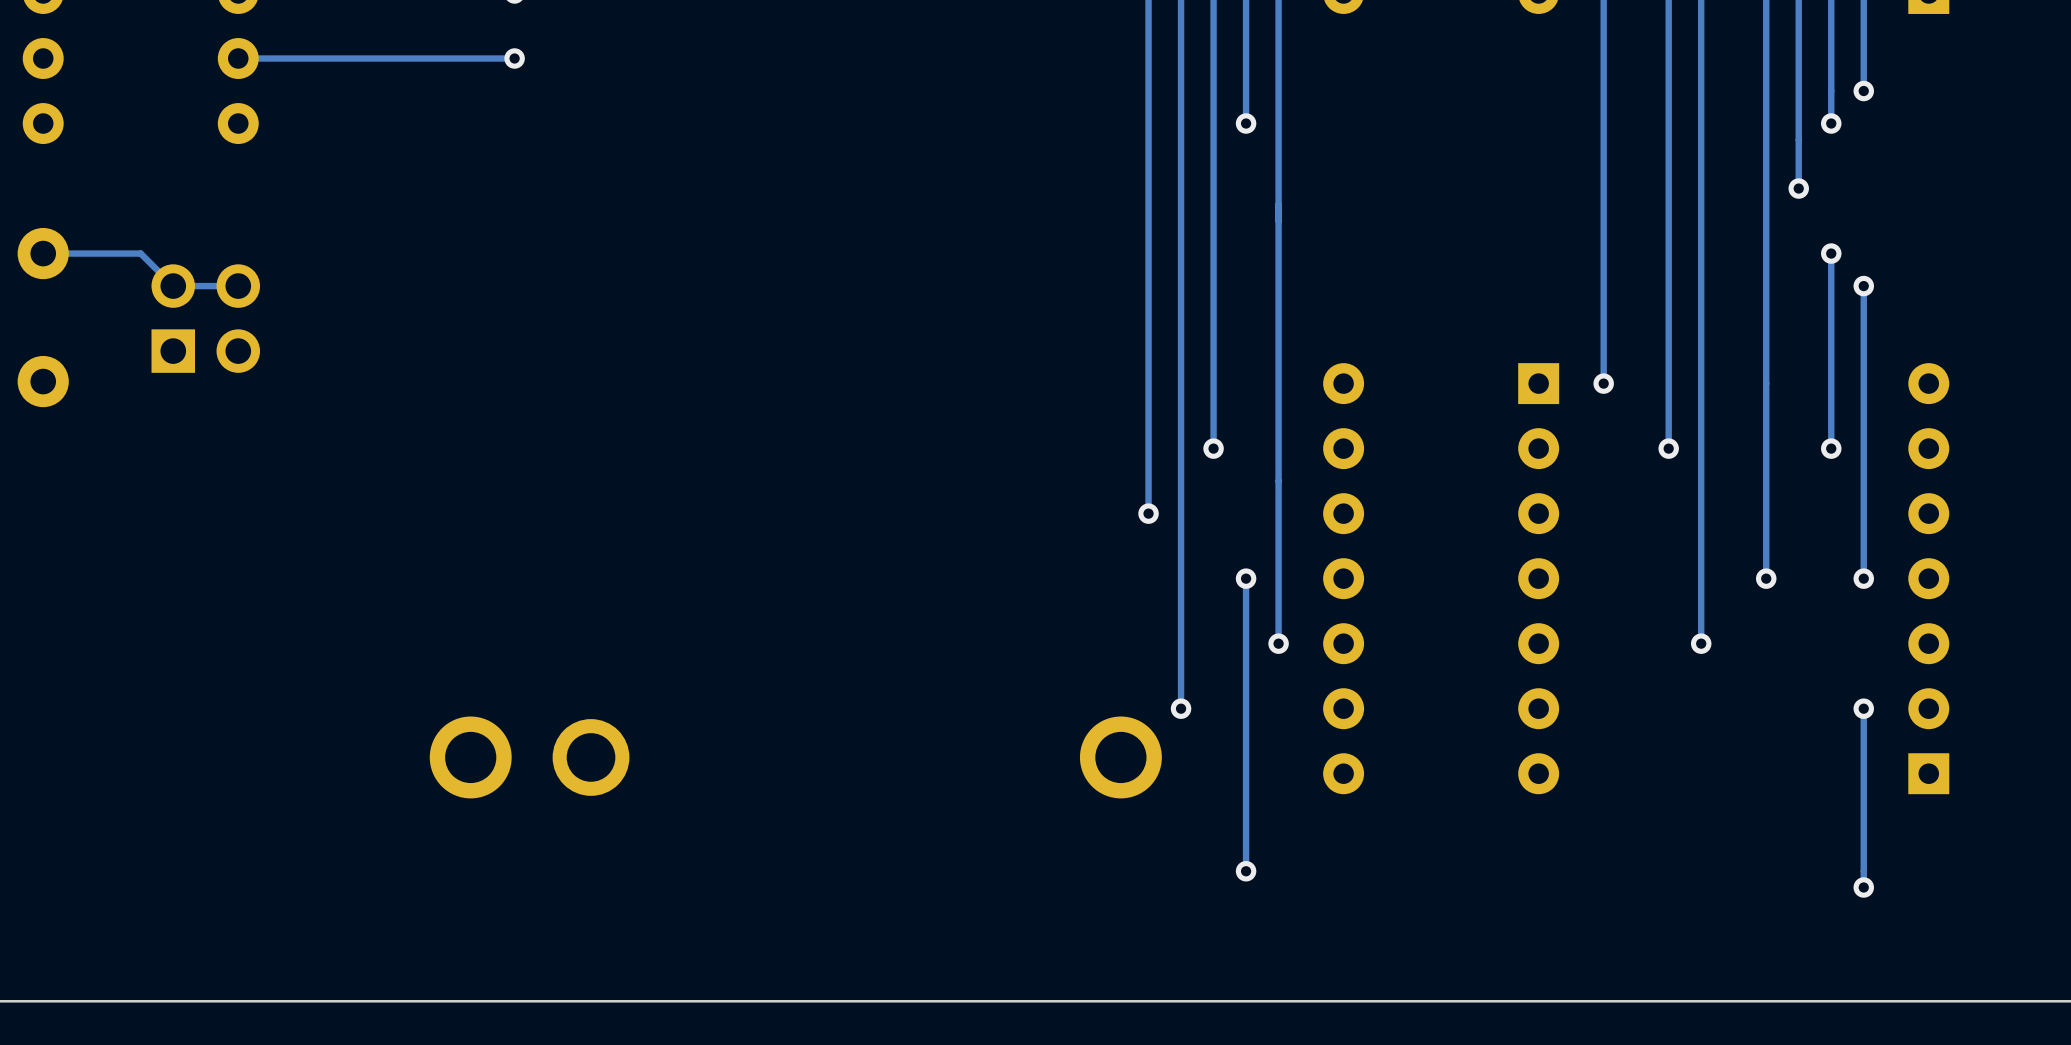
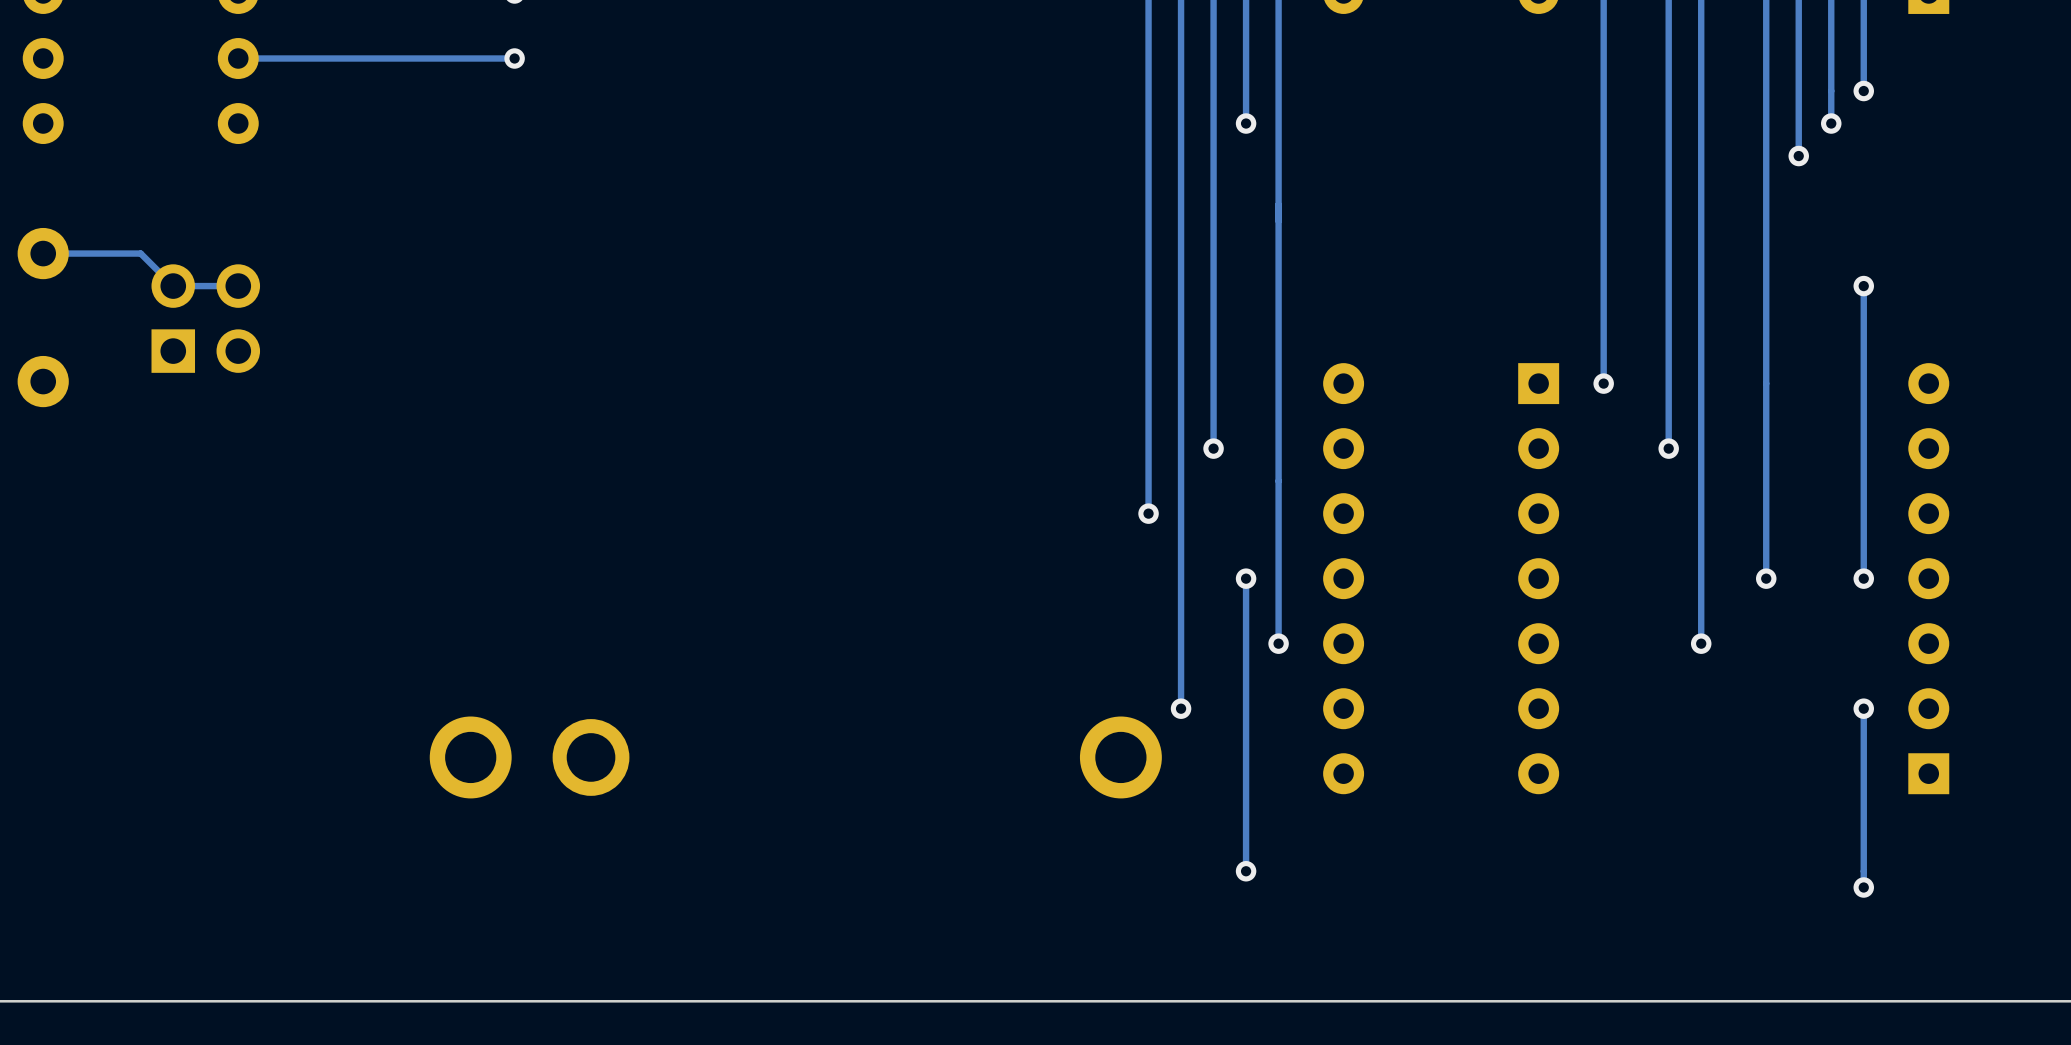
track: (1798, 156) (1798, 188) -> none
via position: (1798, 188) -> (1798, 156)
track: (1831, 253) (1831, 448) -> none
via: (1831, 253) -> none
via: (1831, 448) -> none

